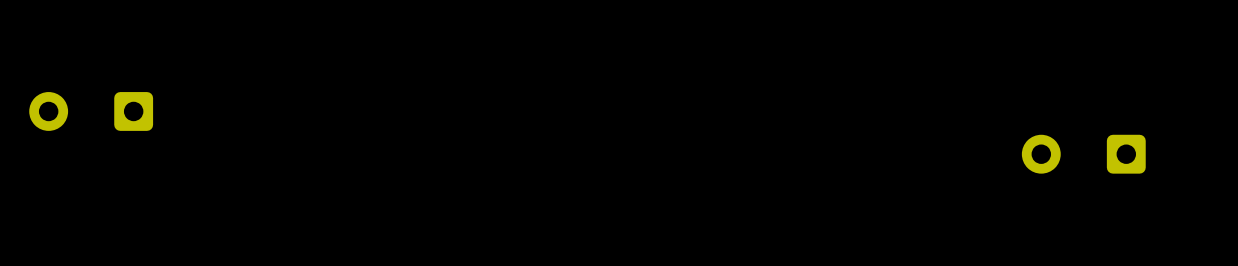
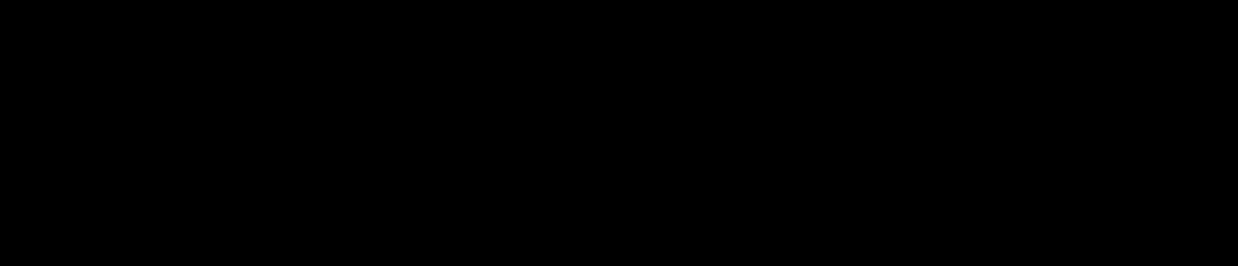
part: (91, 111) -> none
part: (1083, 154) -> none

